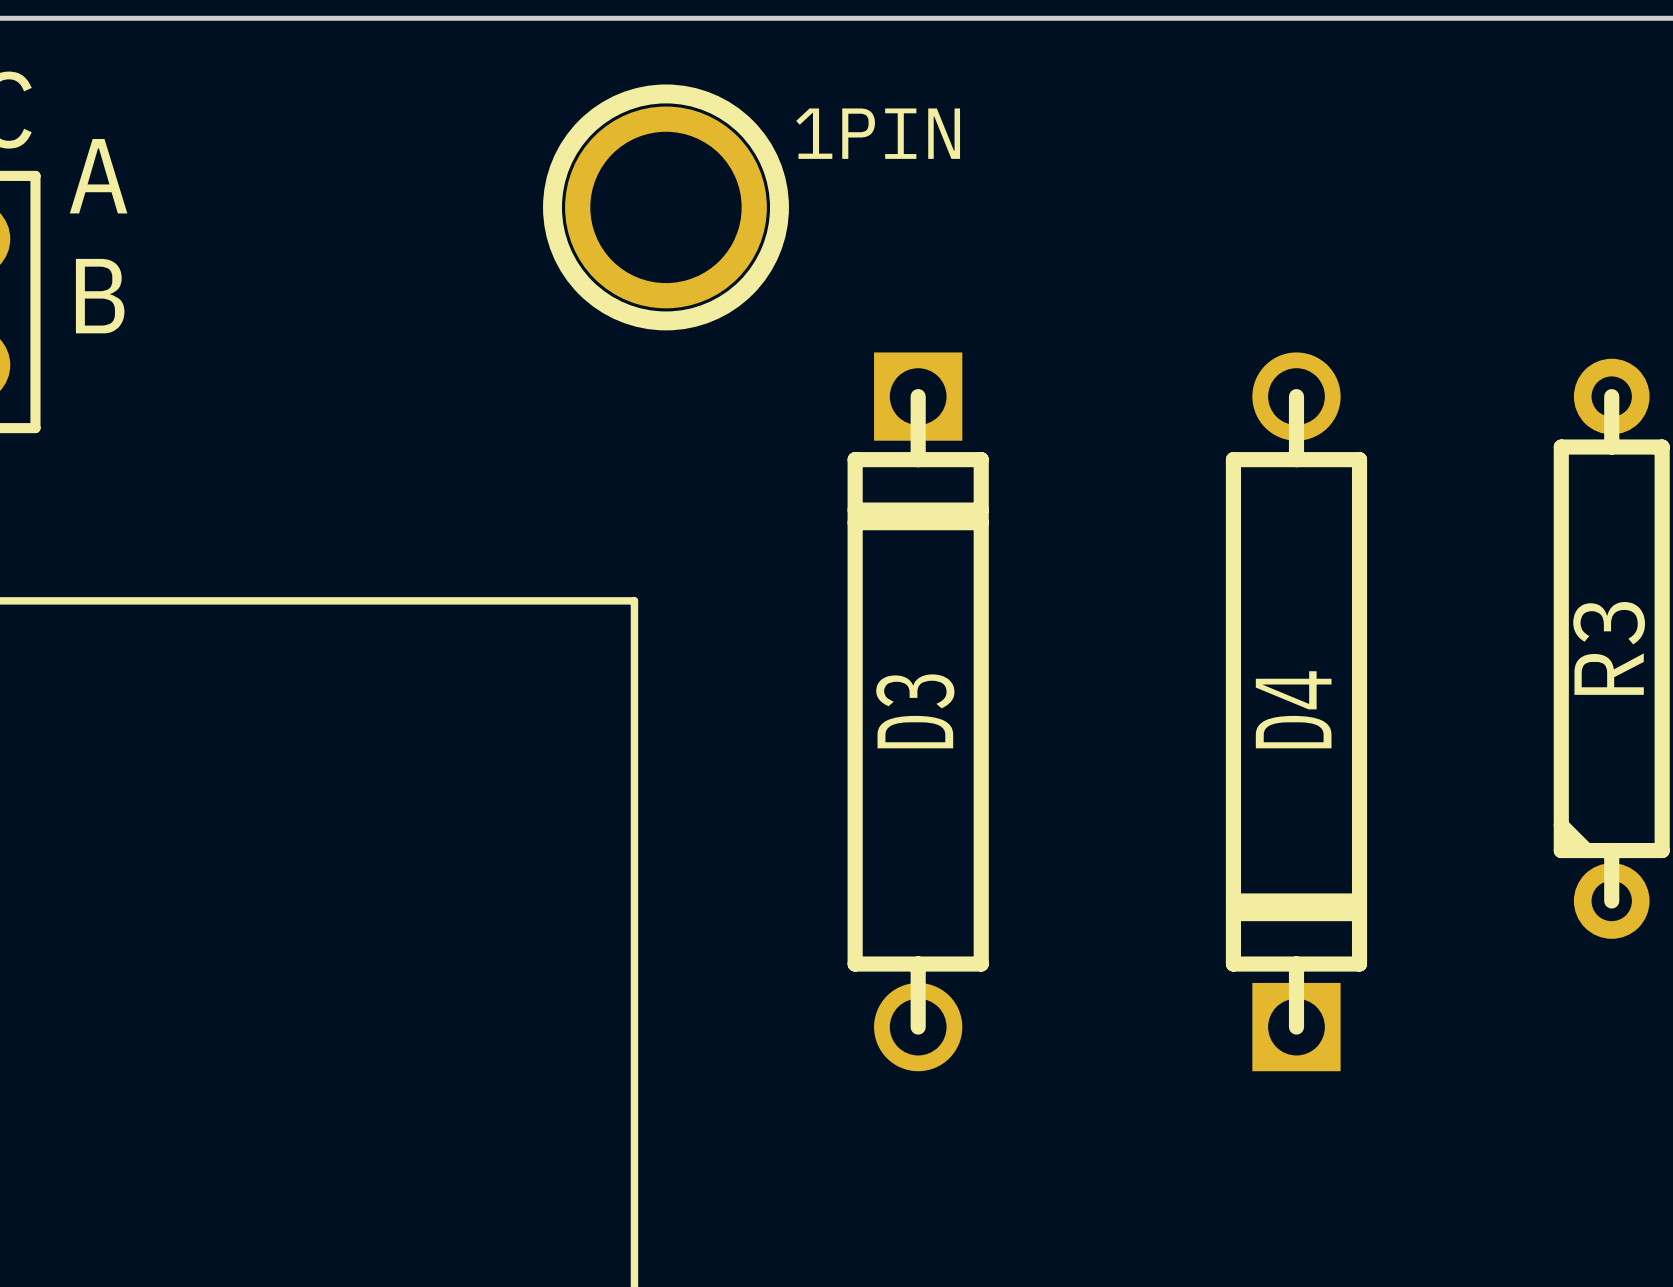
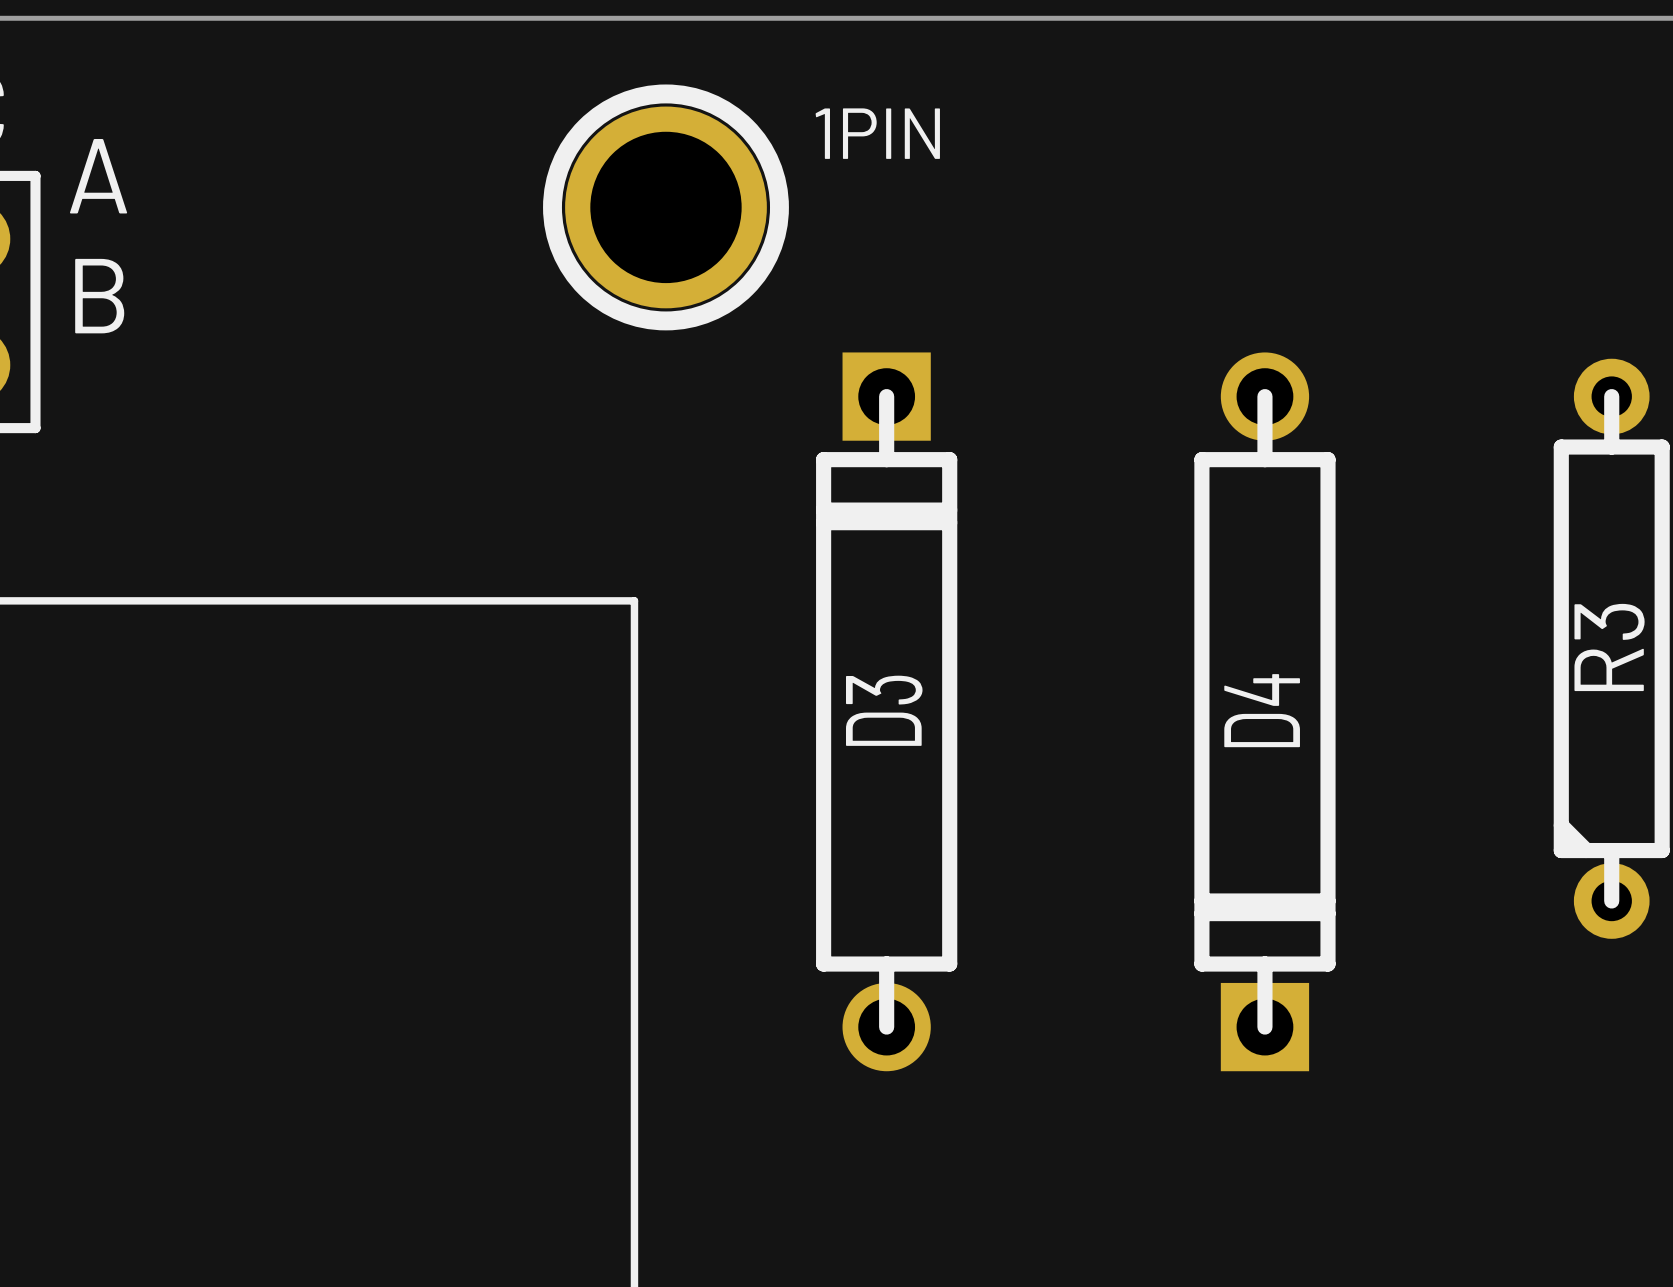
D3 position: (918, 711) -> (886, 711)
D4 position: (1296, 711) -> (1264, 711)

